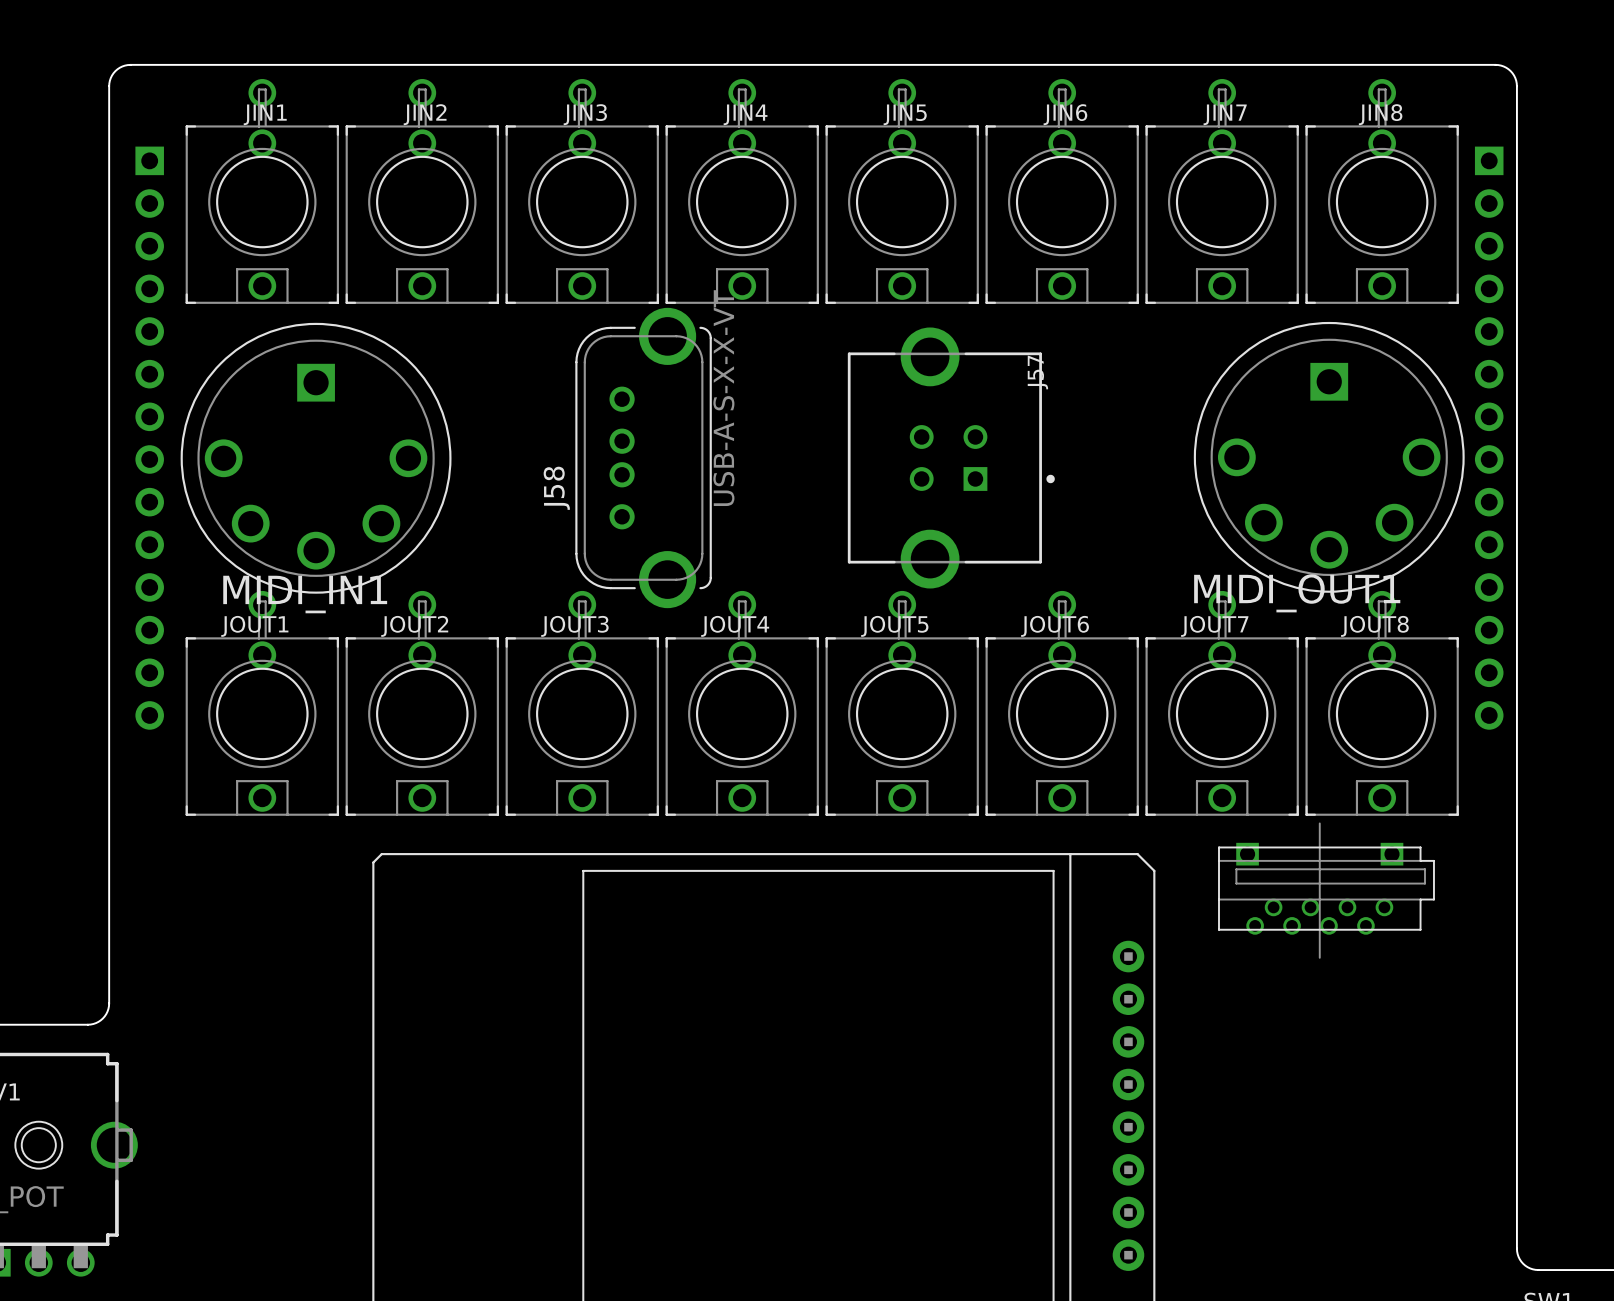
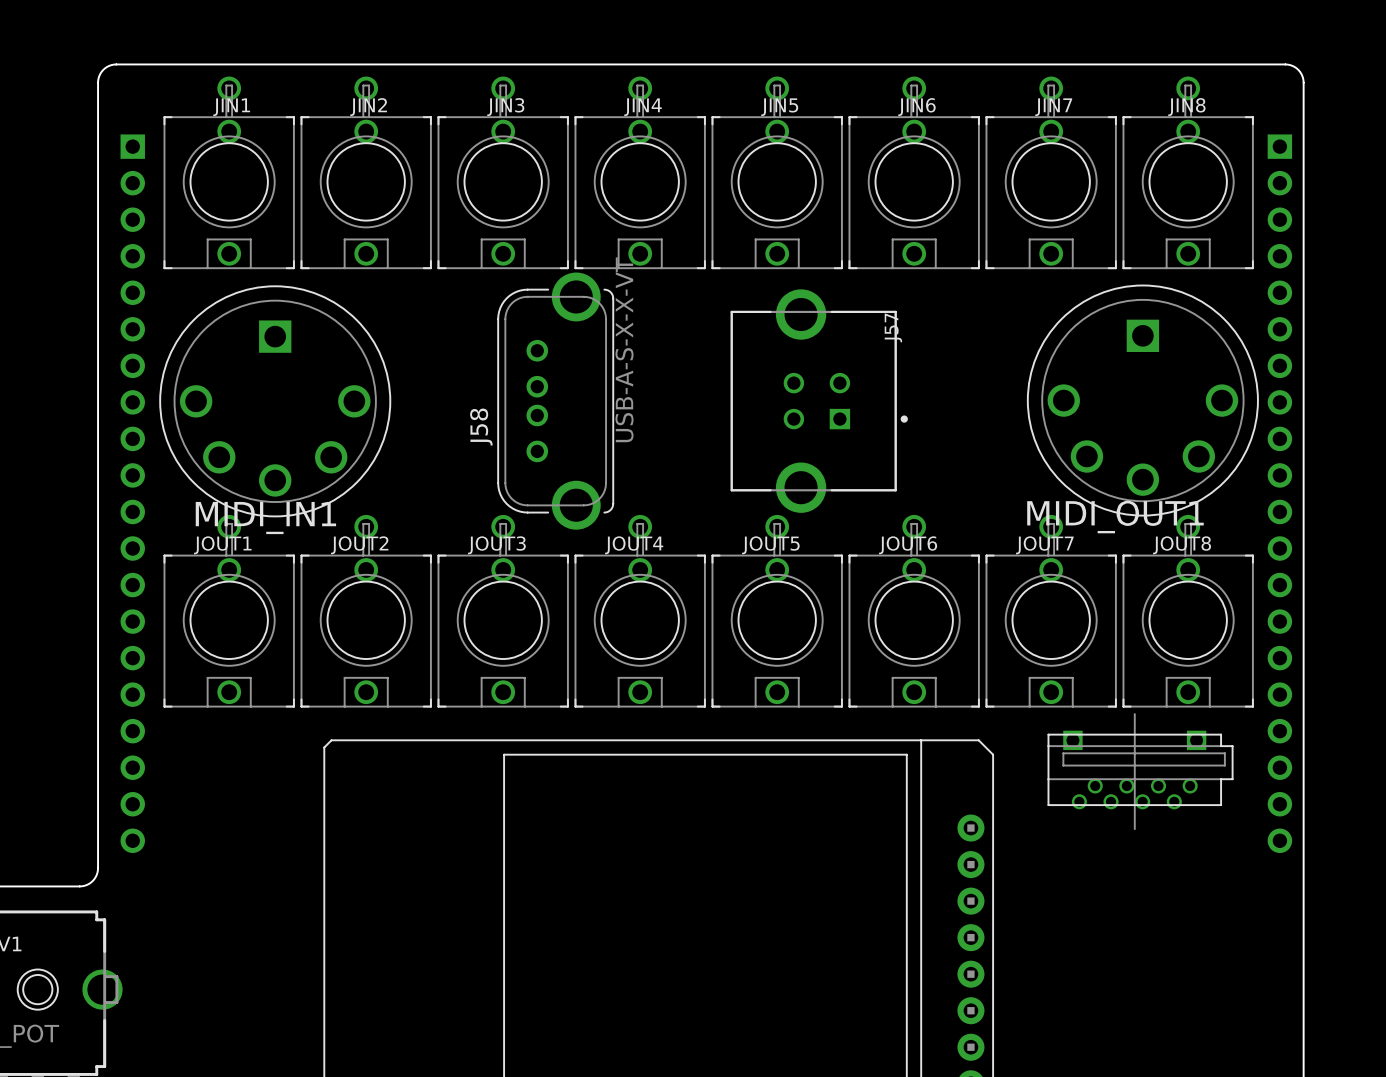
part: none -> (132, 493)
part: none -> (1279, 493)

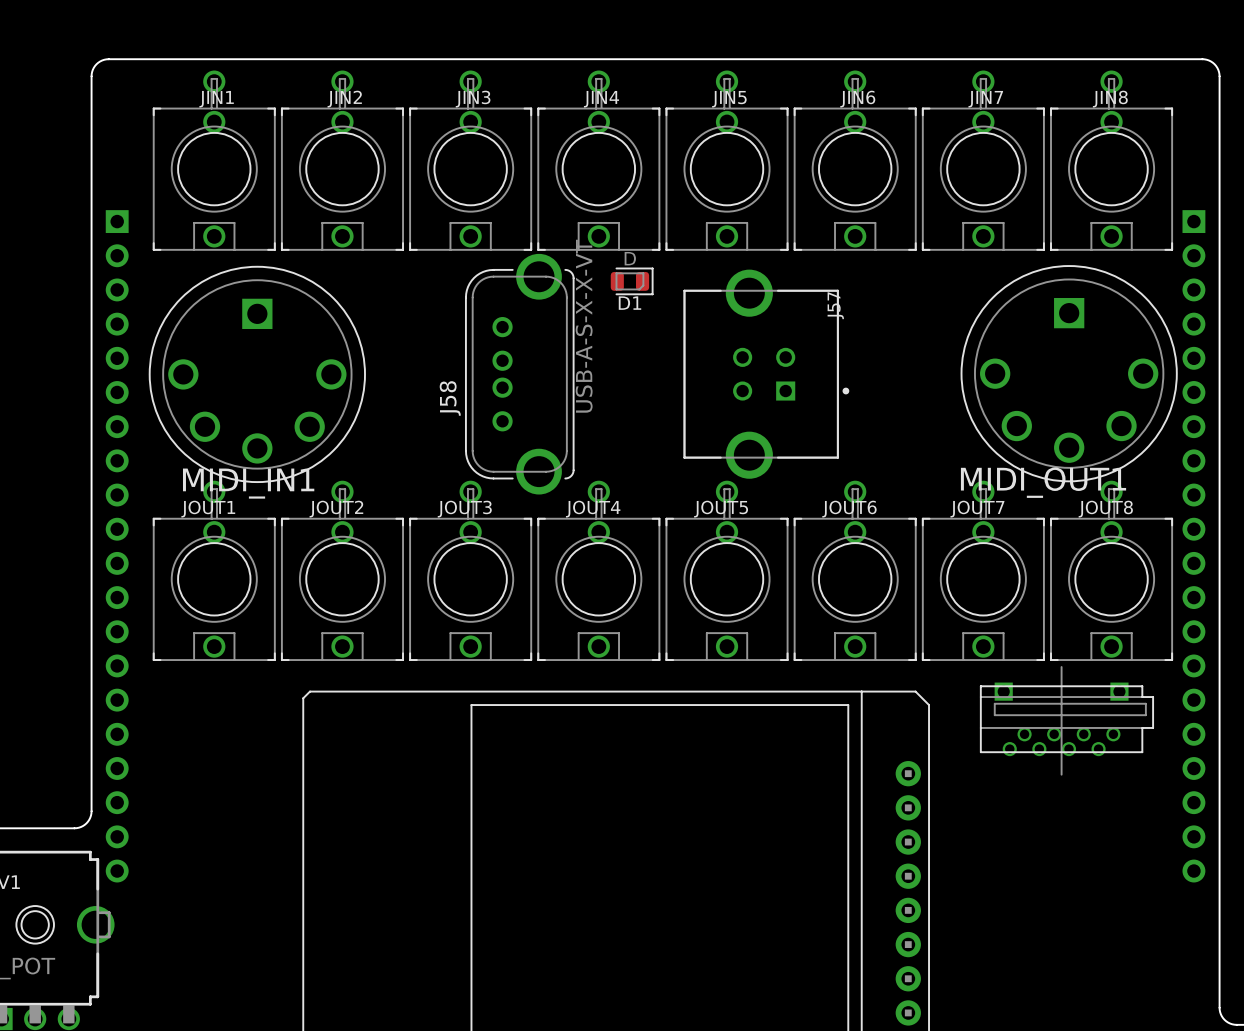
D1: none -> D (632, 281)
part position: (132, 493) -> (117, 546)
part position: (1279, 493) -> (1193, 546)

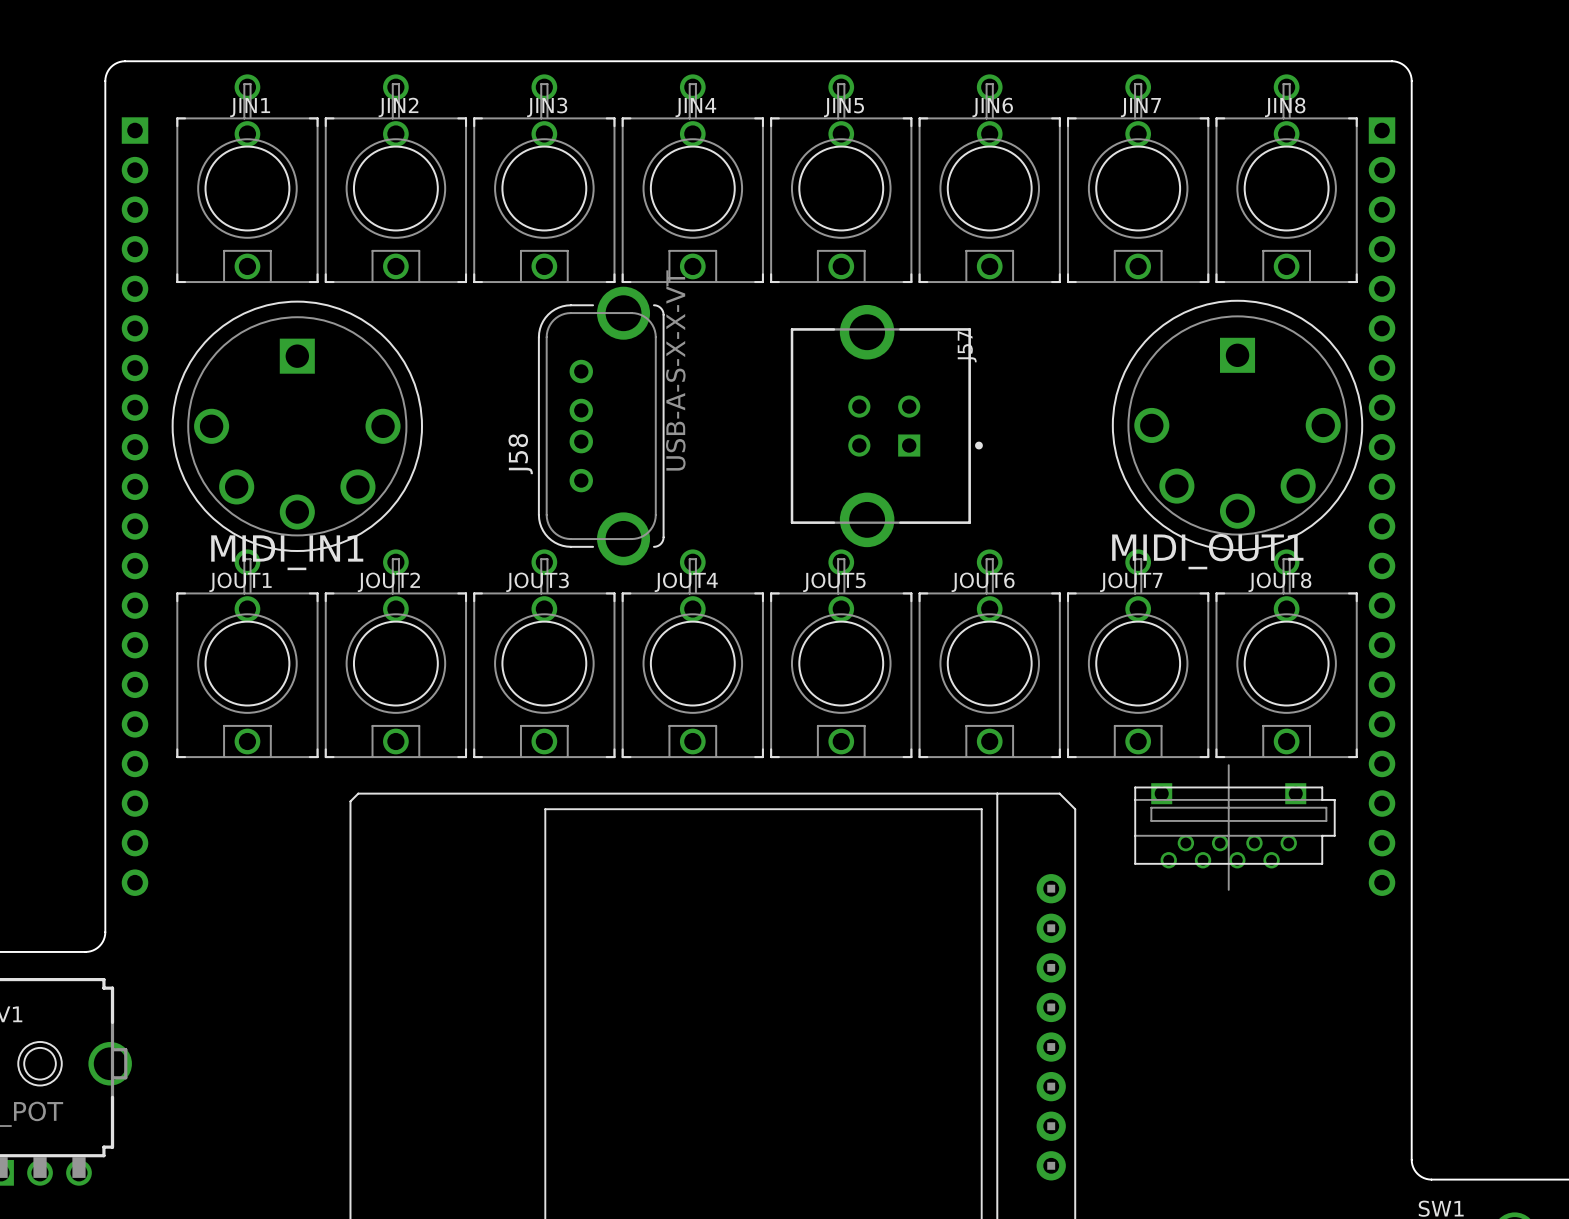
D1: D (632, 281) -> none
part position: (117, 546) -> (135, 506)
part position: (1193, 546) -> (1382, 506)

